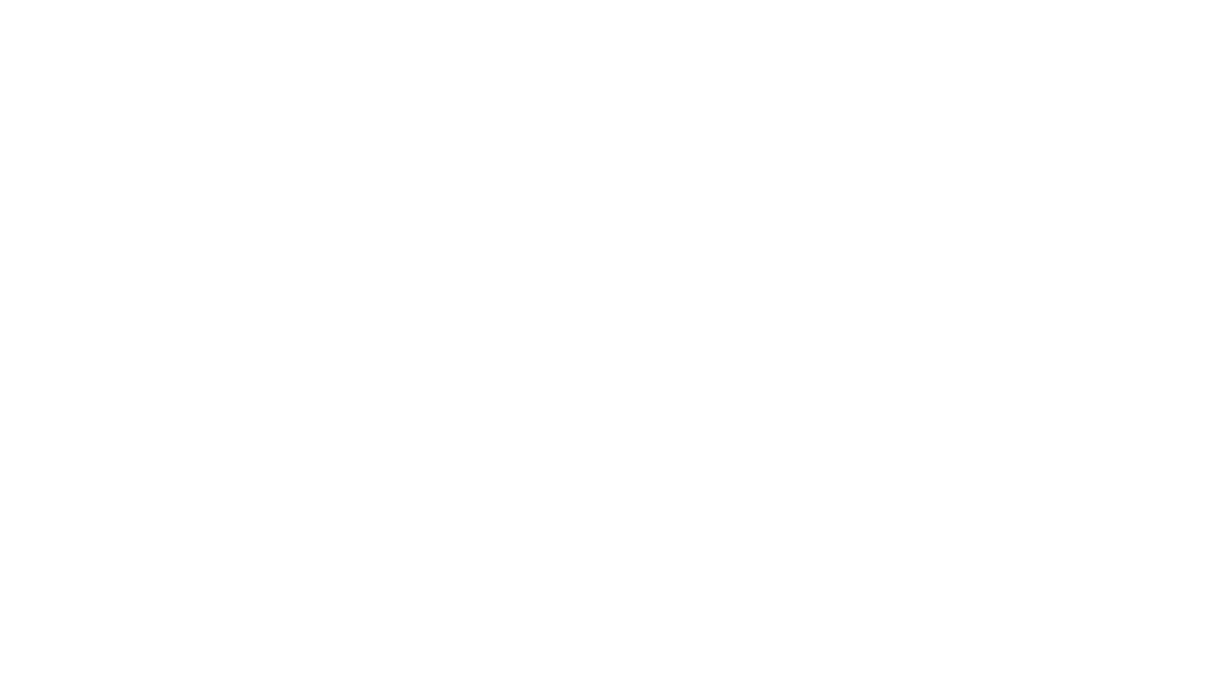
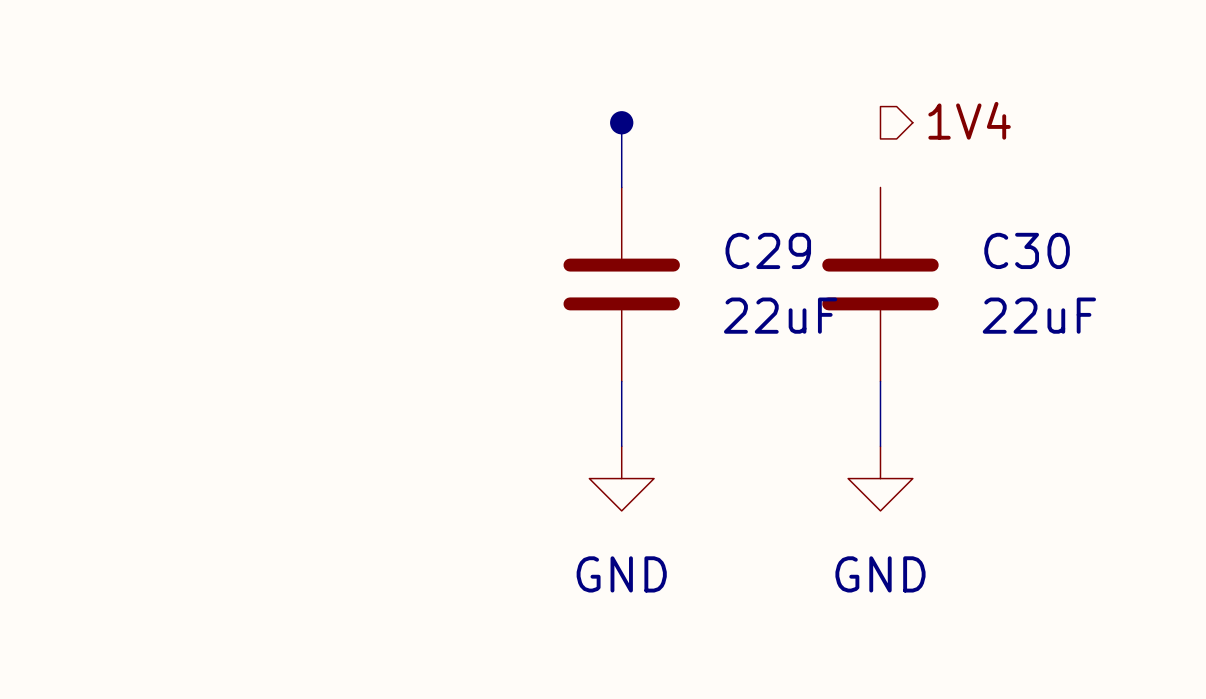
hierarchical label: none -> 1V4 (969, 120)
wire: none -> (621, 122) (621, 187)
junction: none -> (621, 122)
C29: none -> 22uF (621, 284)
C30: none -> 22uF (880, 284)
wire: none -> (621, 381) (621, 446)
wire: none -> (880, 381) (880, 446)
power symbol: none -> GND (621, 478)
power symbol: none -> GND (880, 478)

